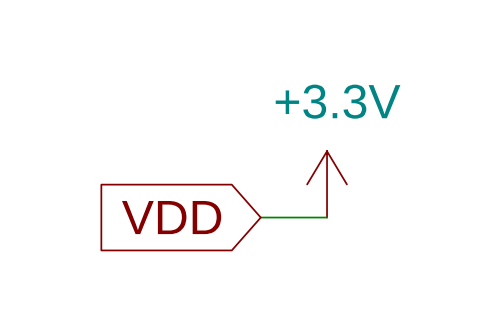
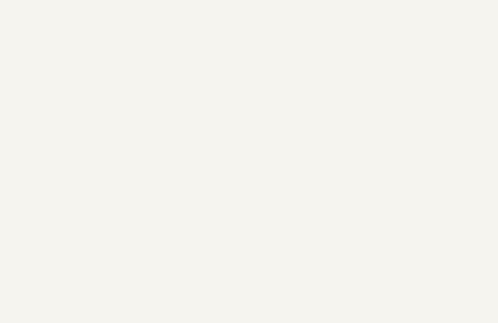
power symbol: +3.3V (327, 184) -> none
global label: VDD (171, 217) -> none
wire: (260, 217) (327, 217) -> none

